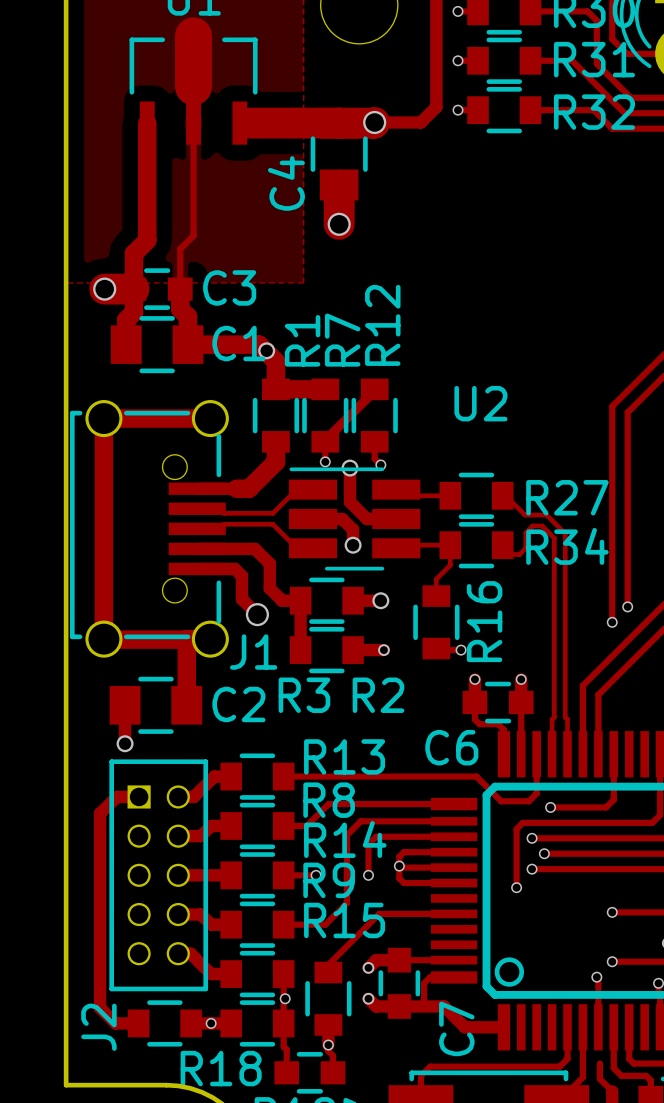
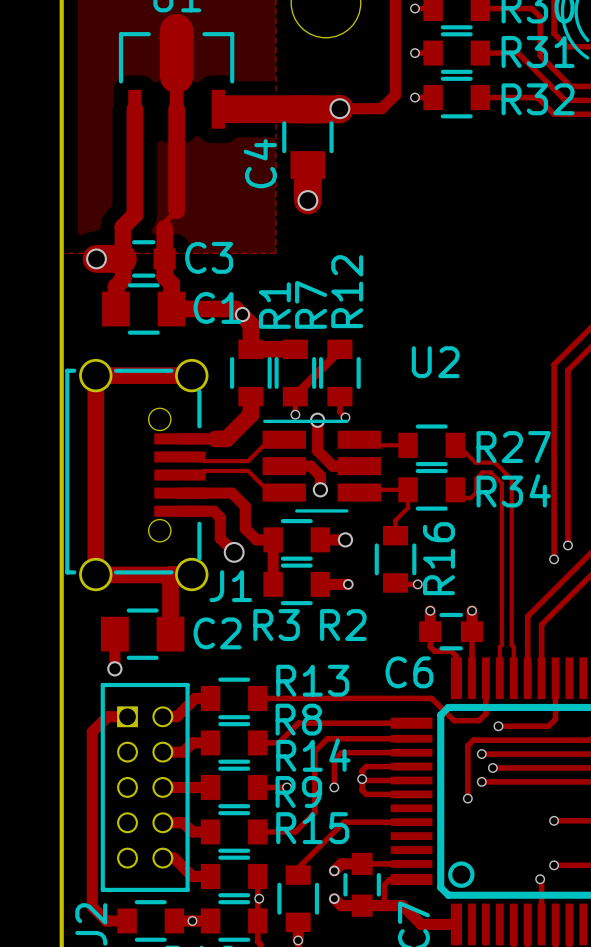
track width: thin (193, 123) (193, 235) -> thick (176, 109) (176, 210)
track width: thin (180, 255) (180, 289) -> thick (164, 228) (164, 258)

